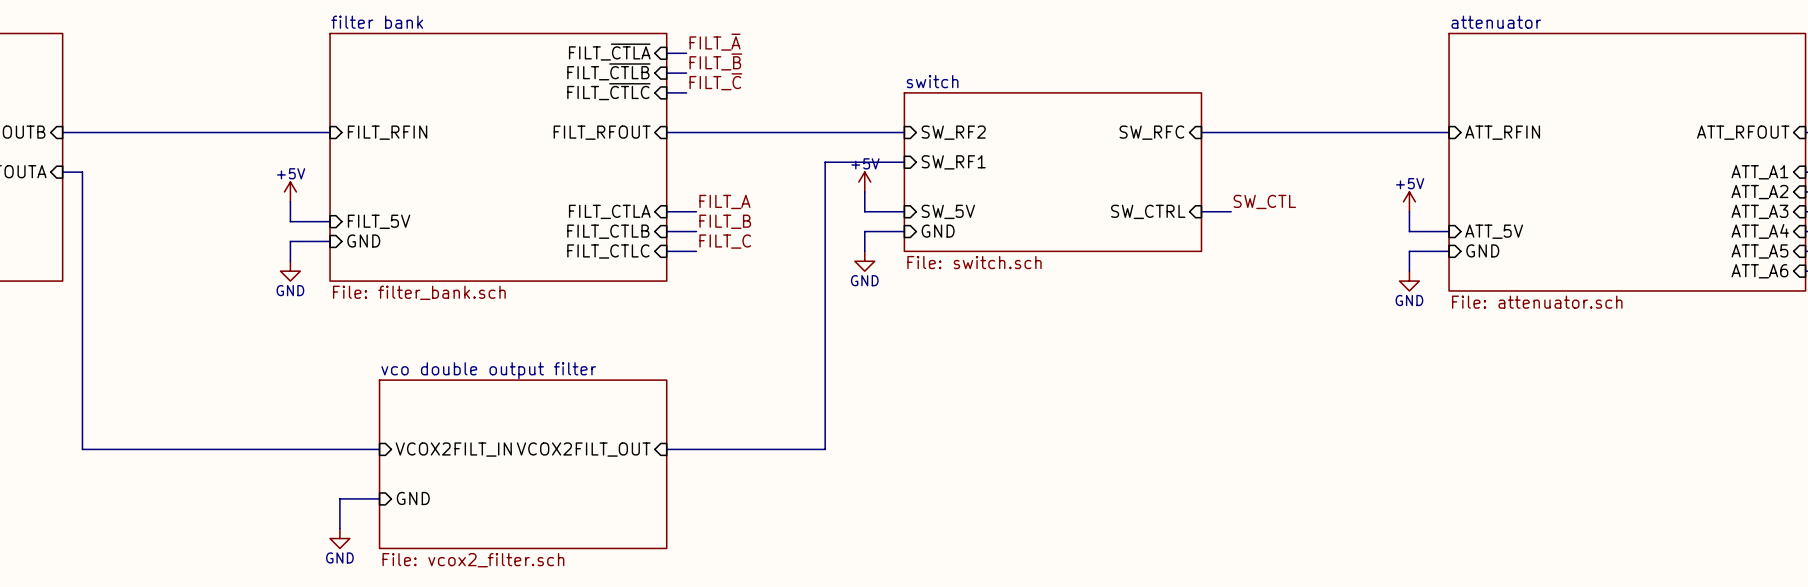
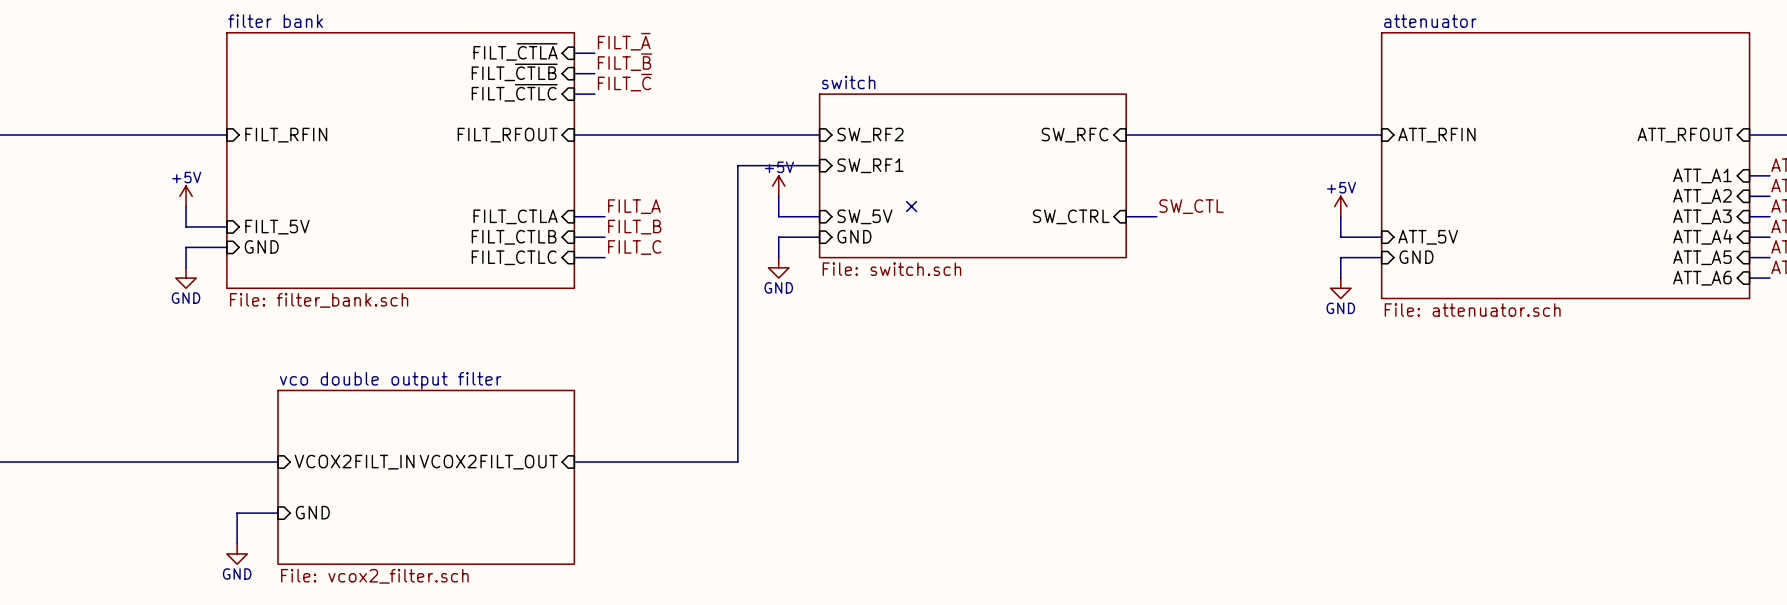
no-connect mark: none -> (911, 206)

